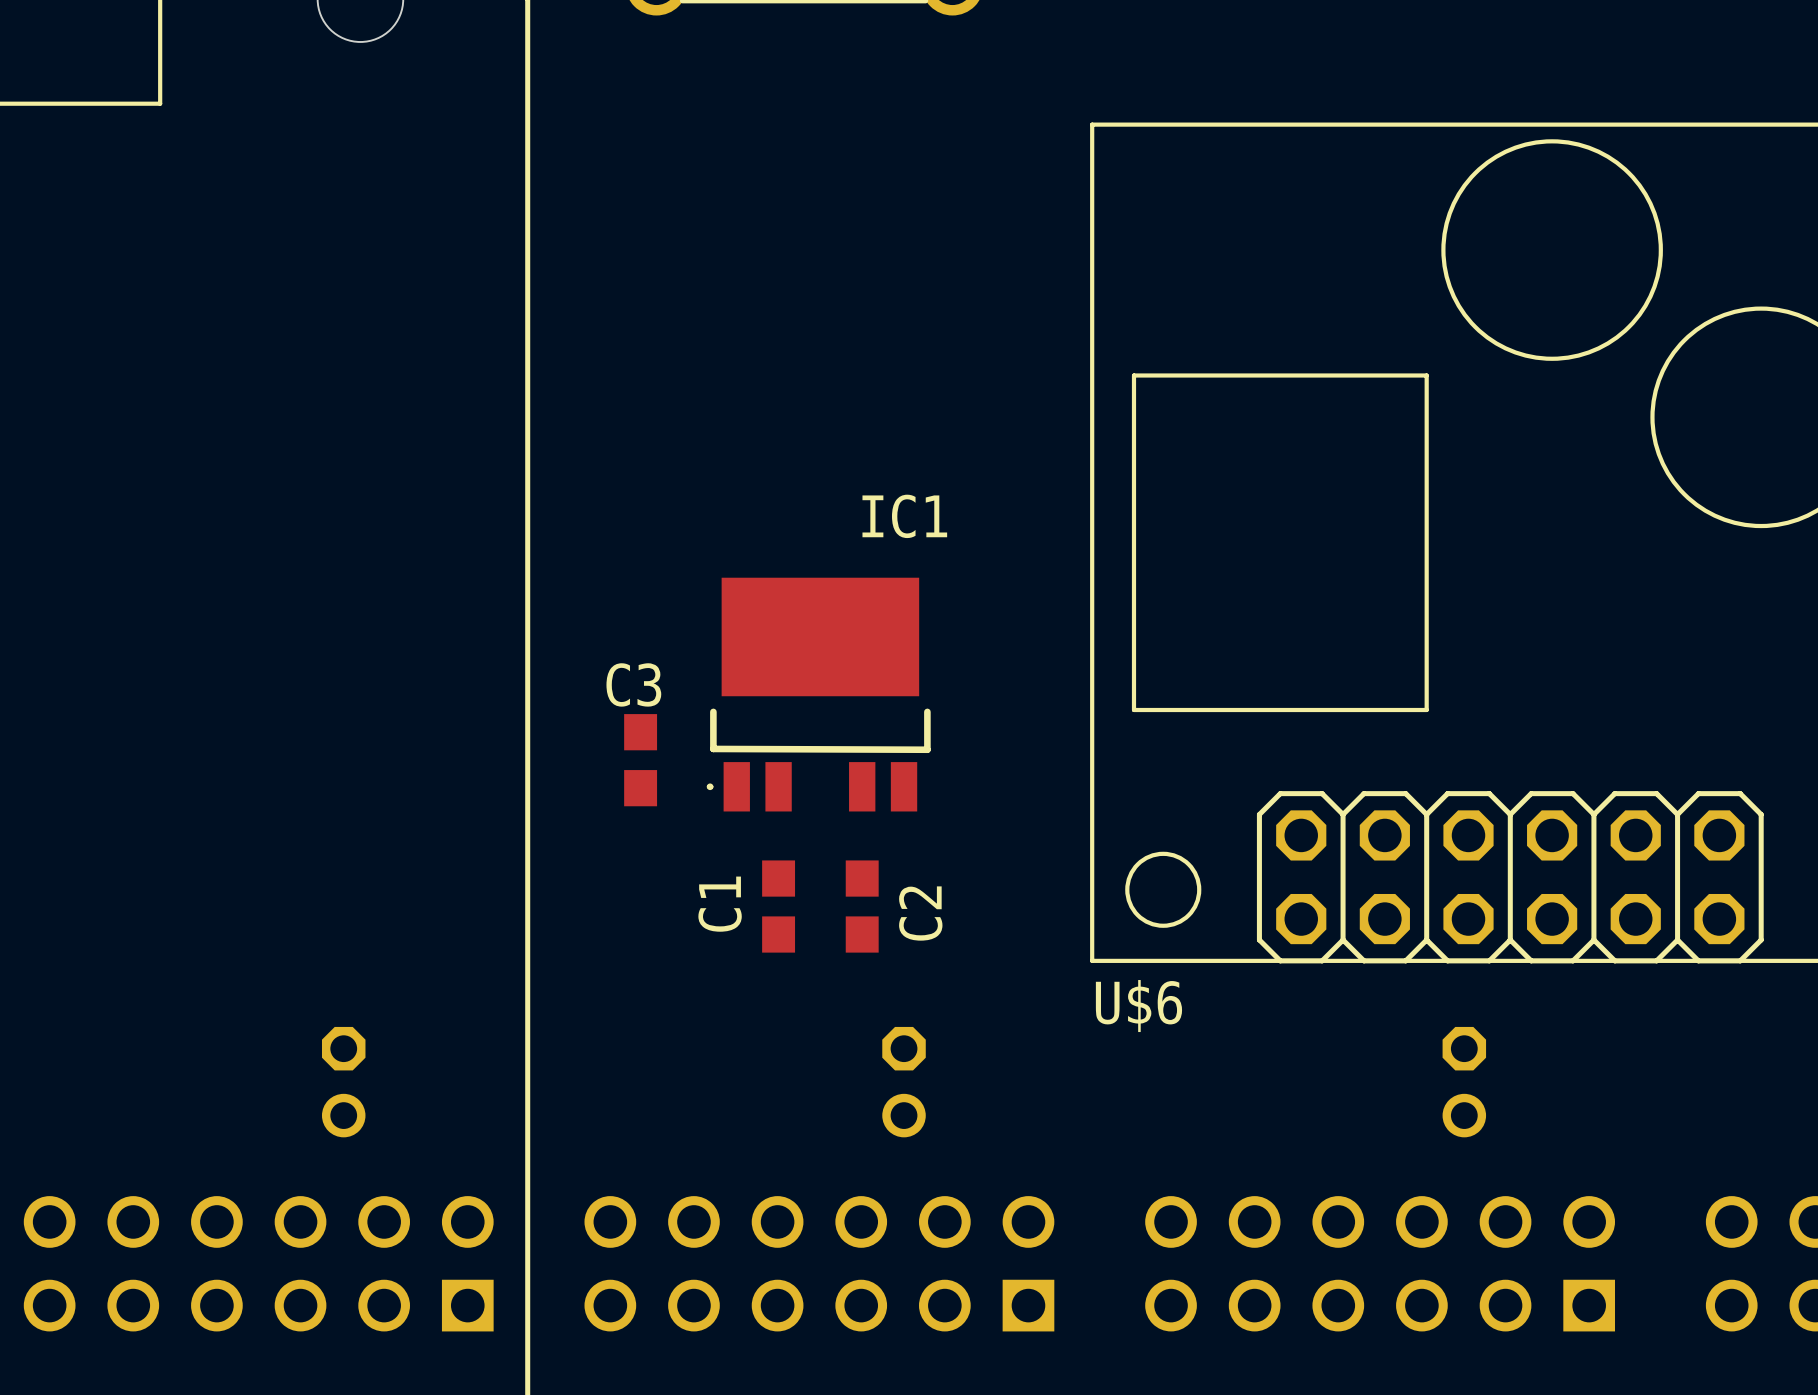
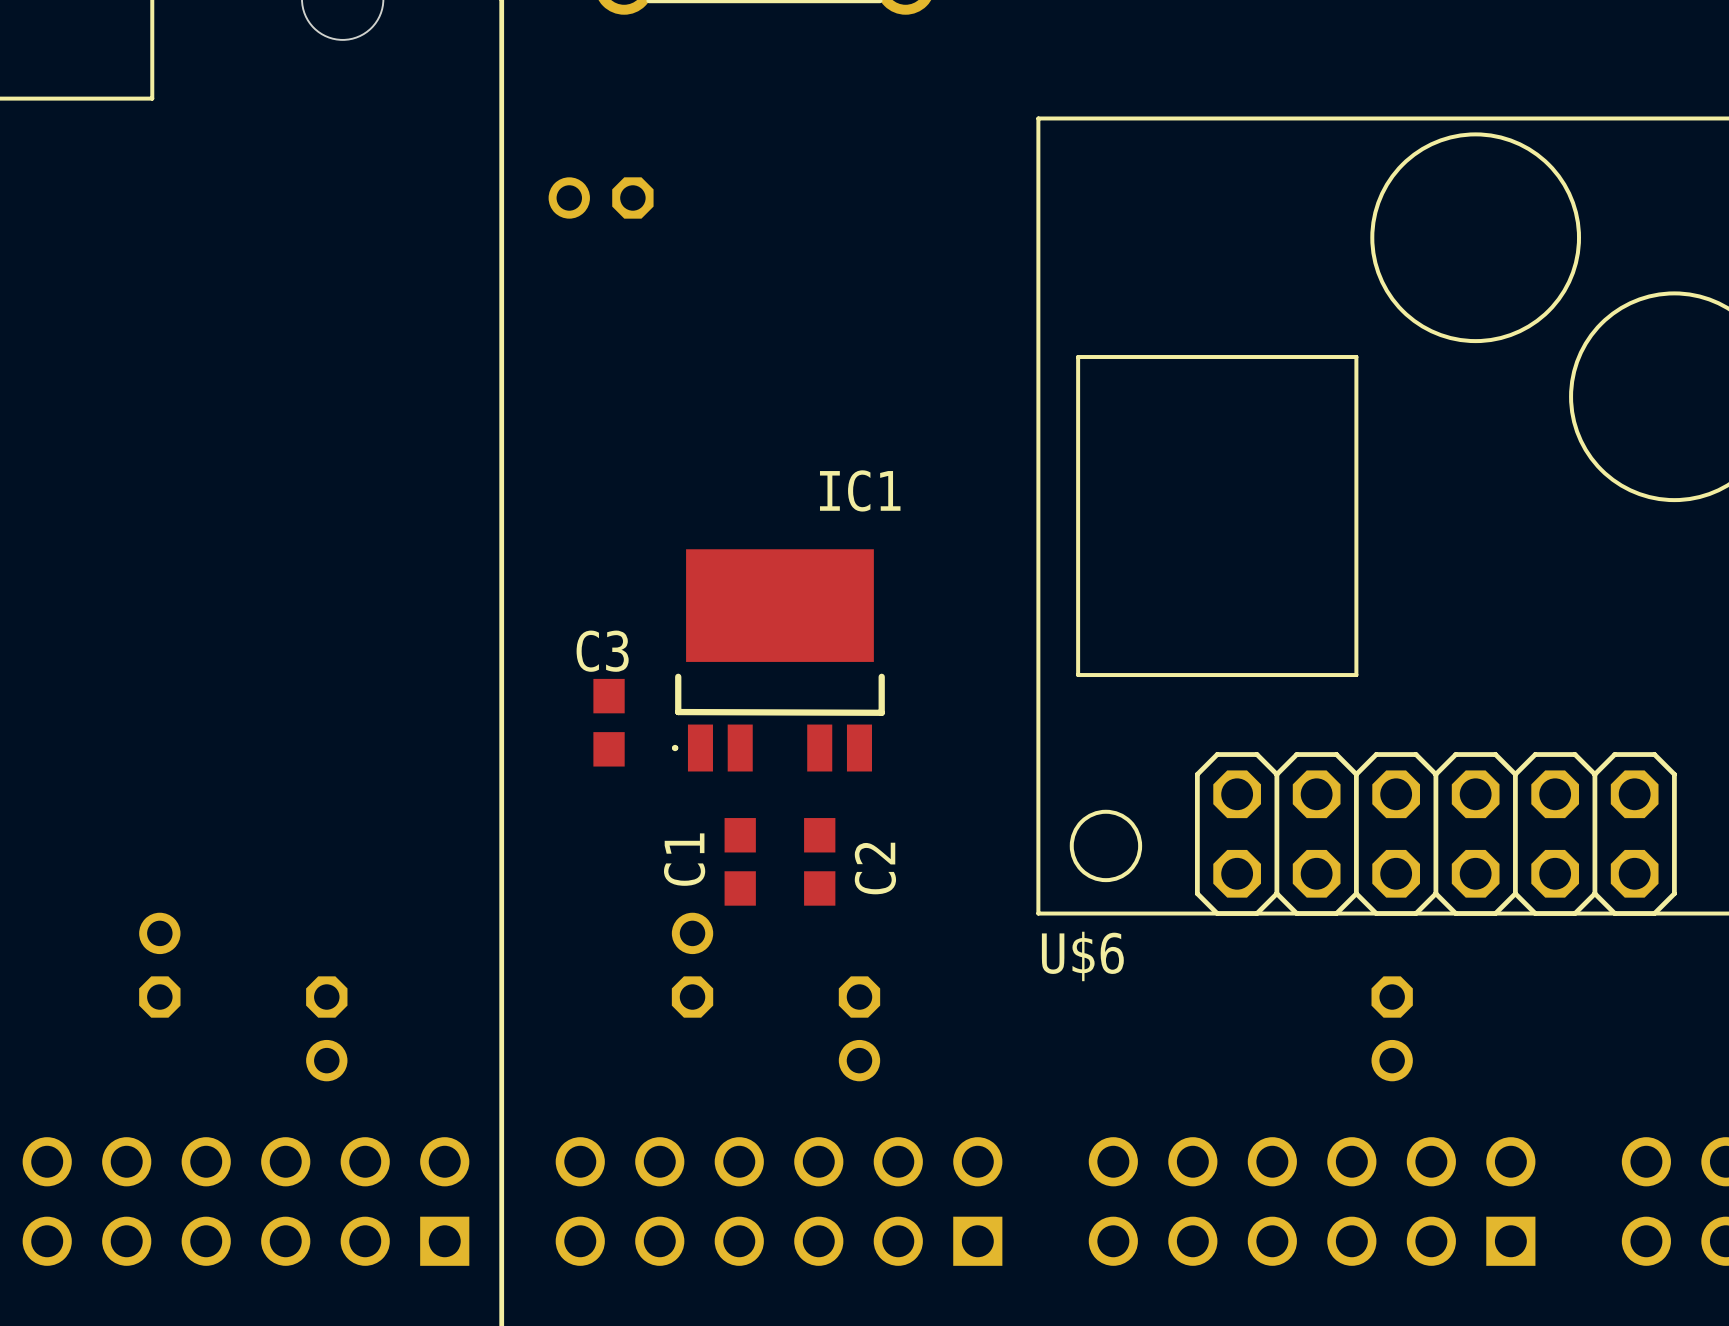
part: none -> (601, 197)
part: none -> (159, 965)
part: none -> (692, 965)

